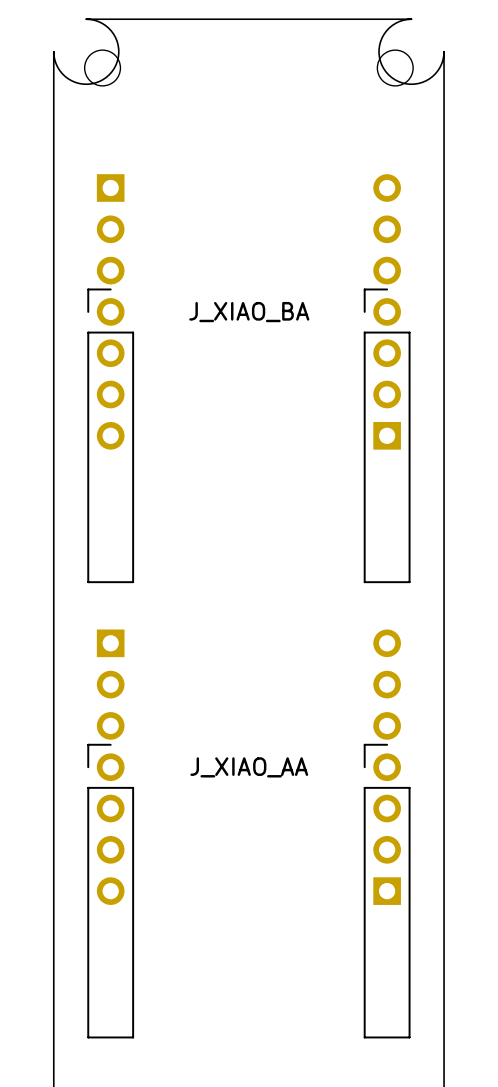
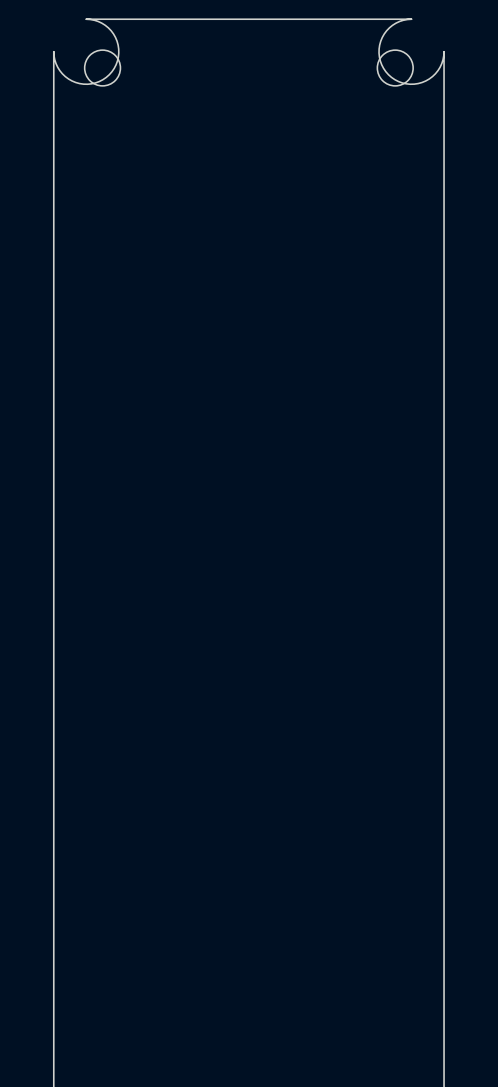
J_XIAO_BA: (110, 378) -> none
part: (387, 378) -> none
J_XIAO_AA: (110, 833) -> none
part: (387, 833) -> none

